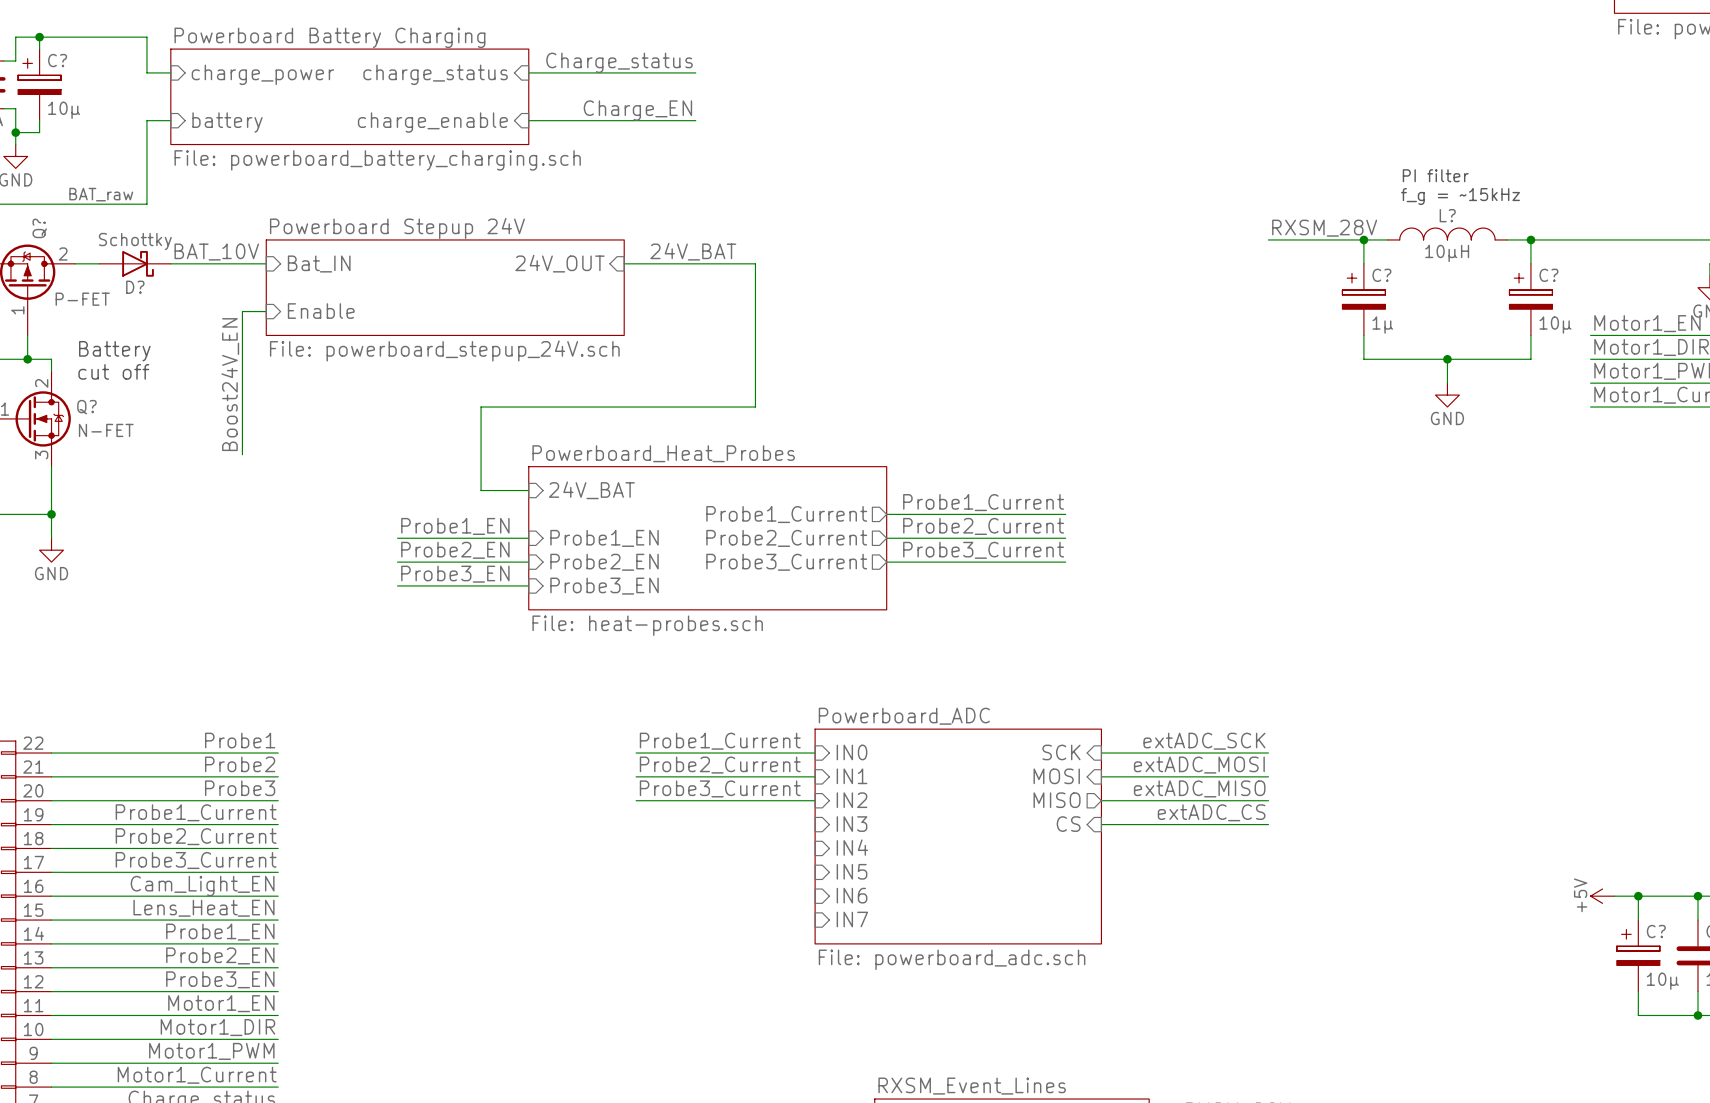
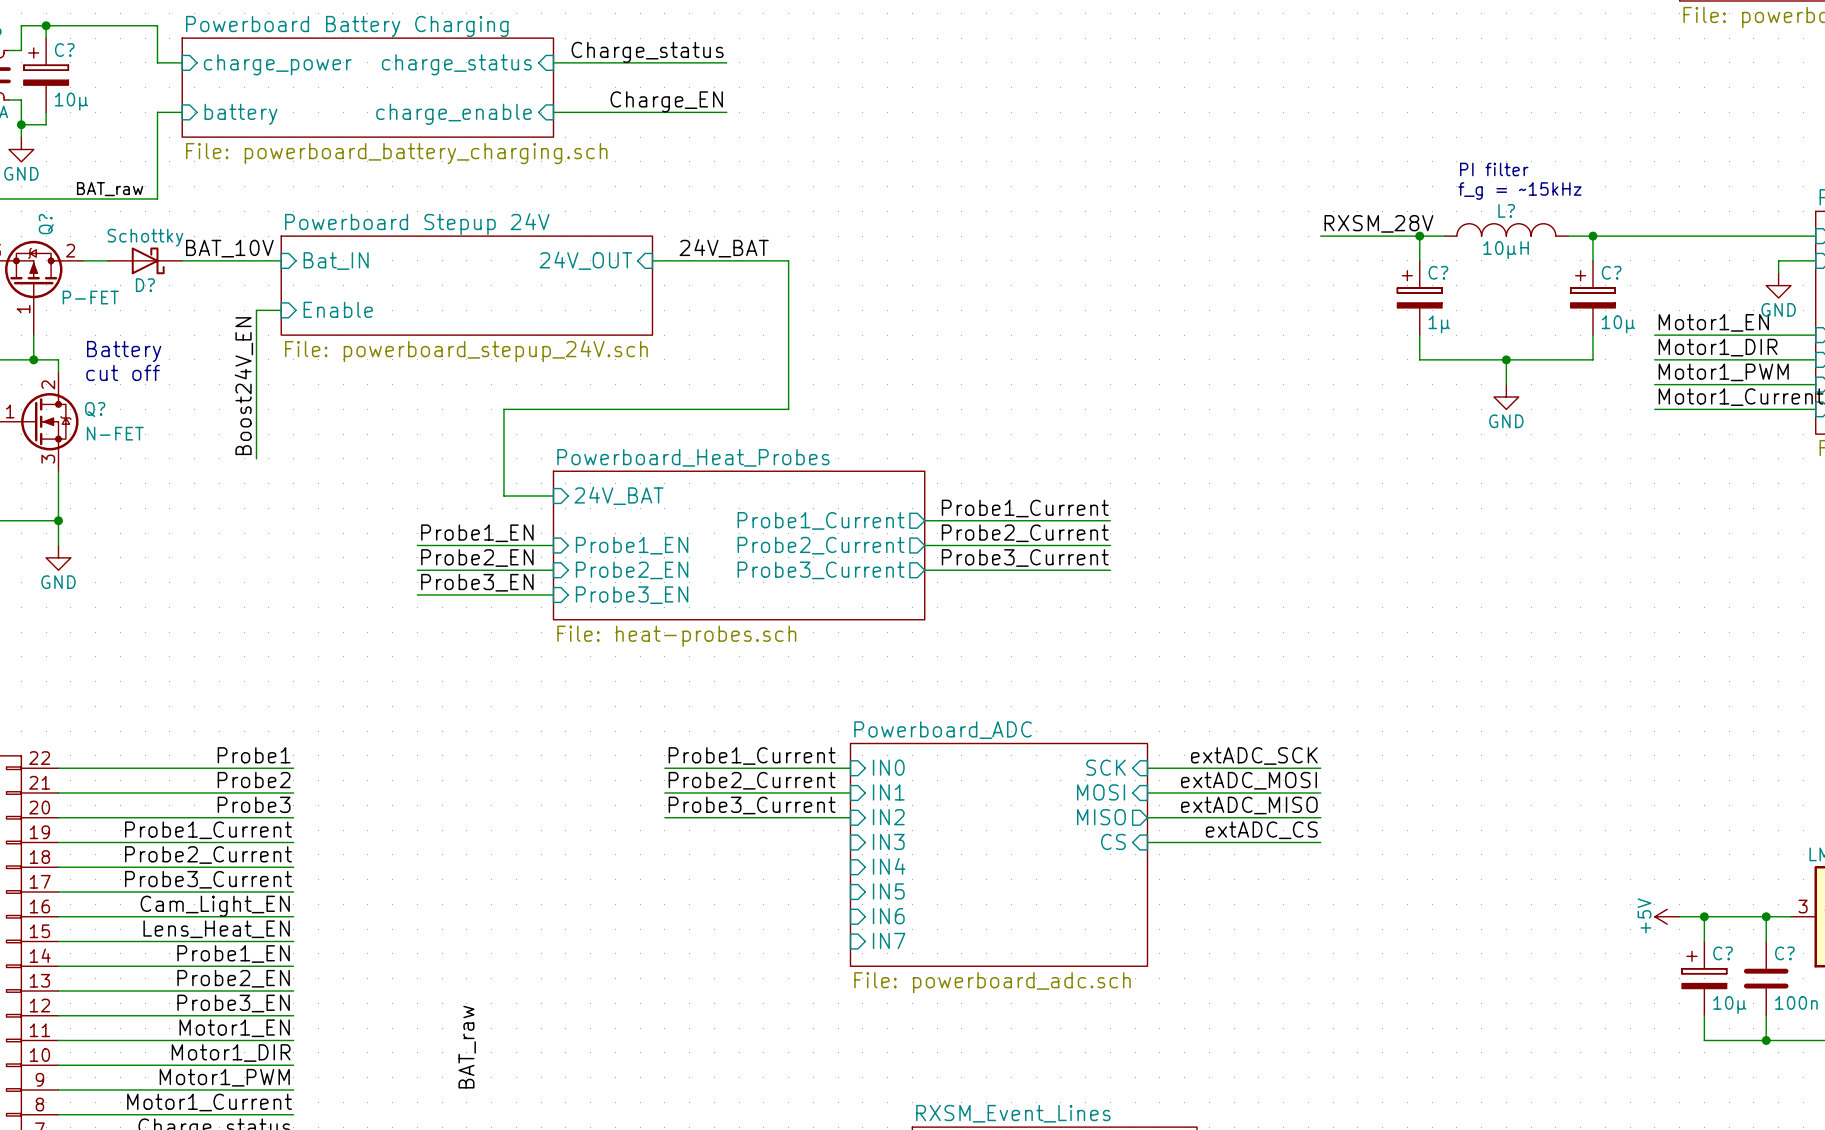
label: none -> BAT_raw (467, 1047)

